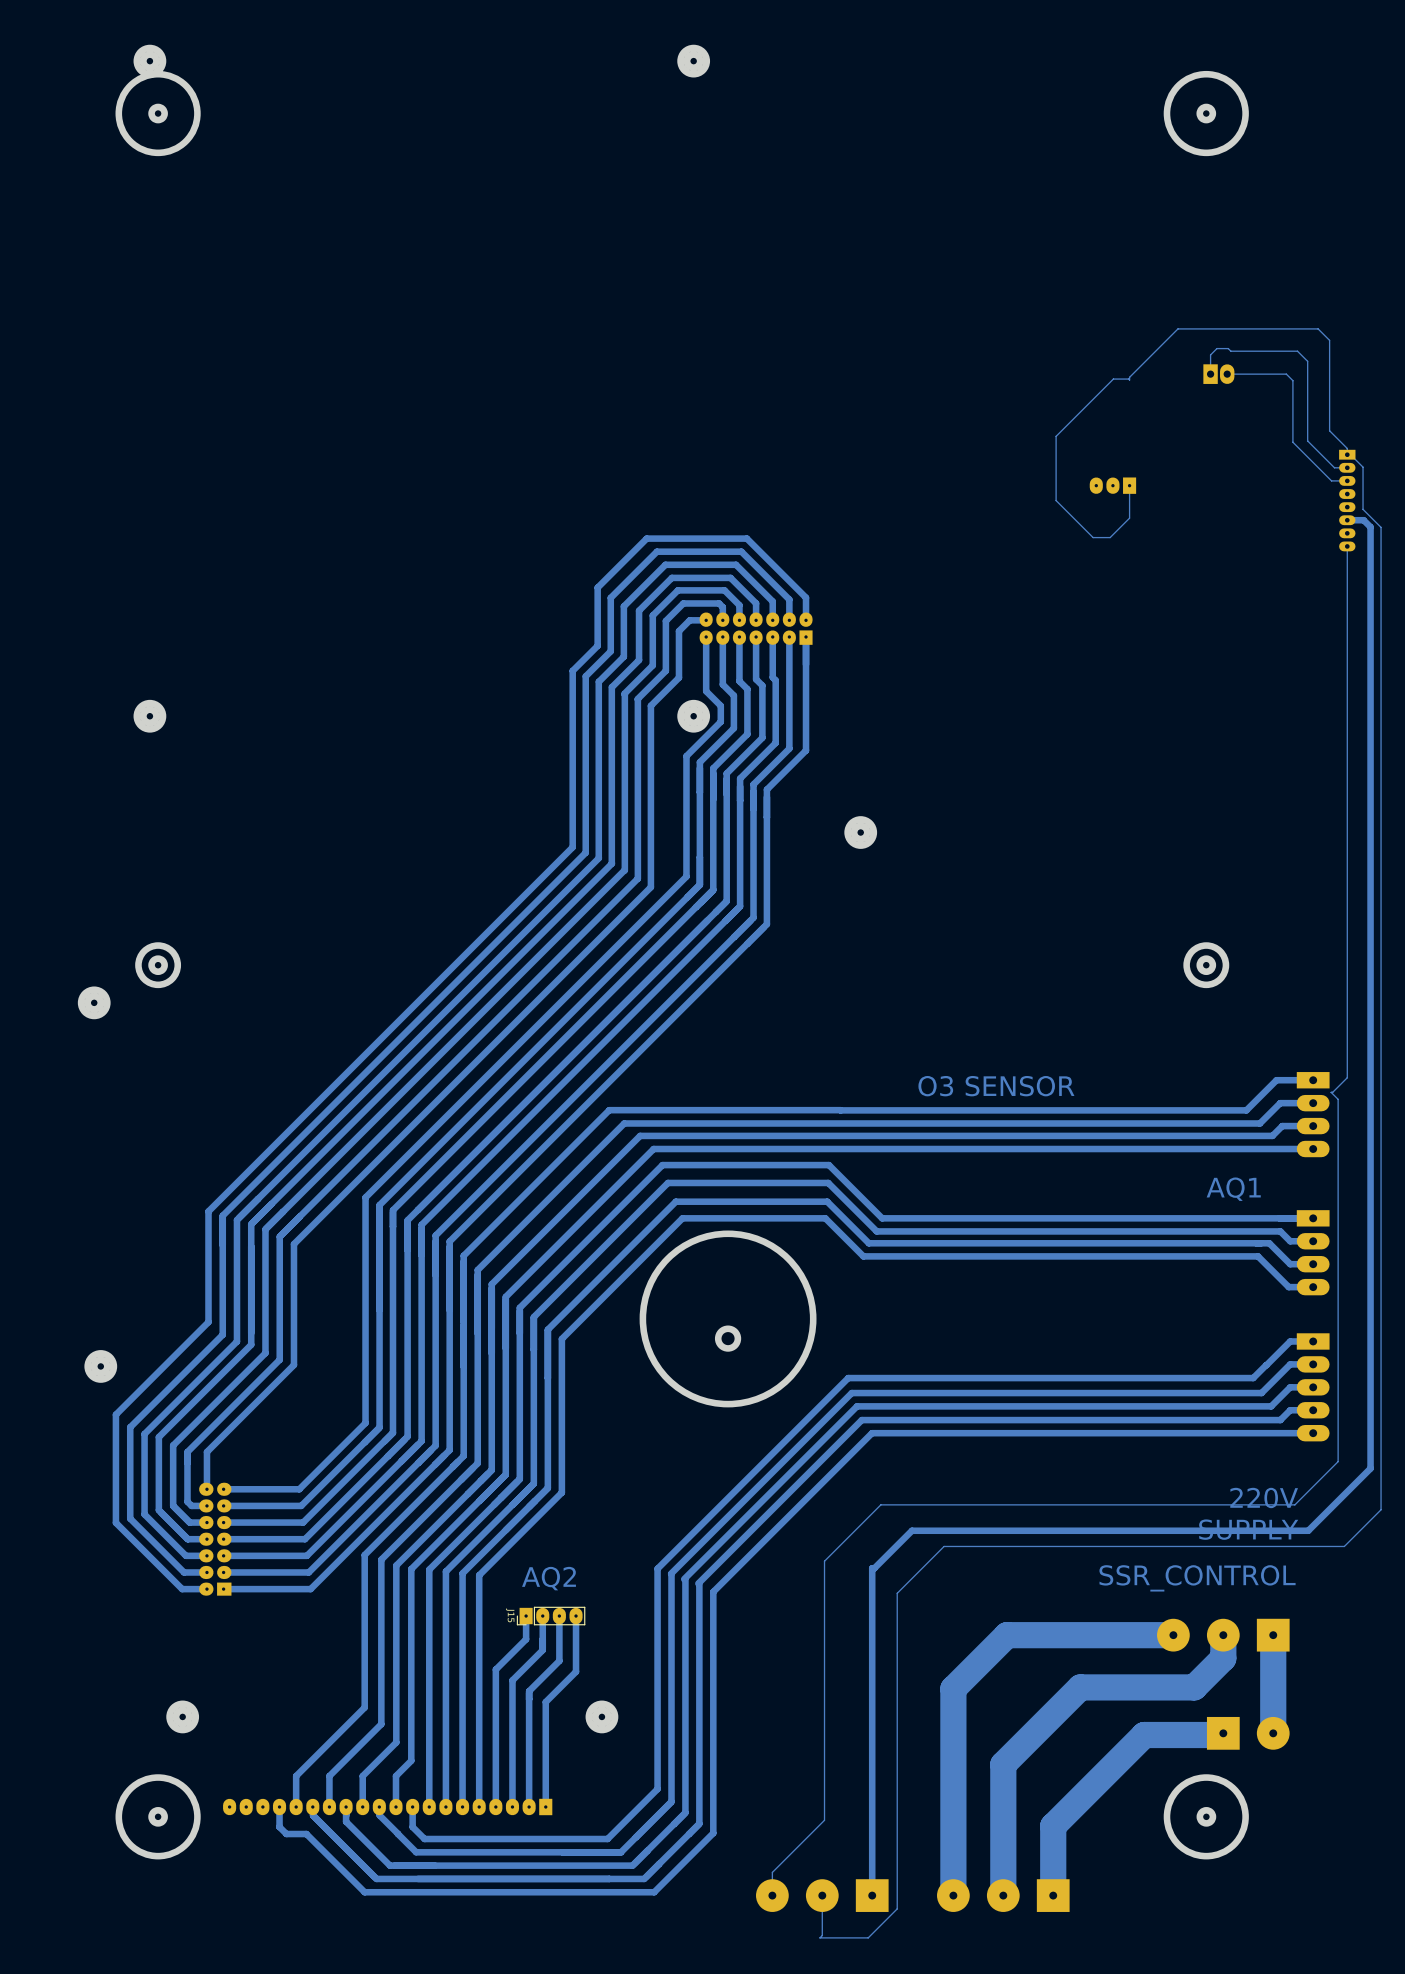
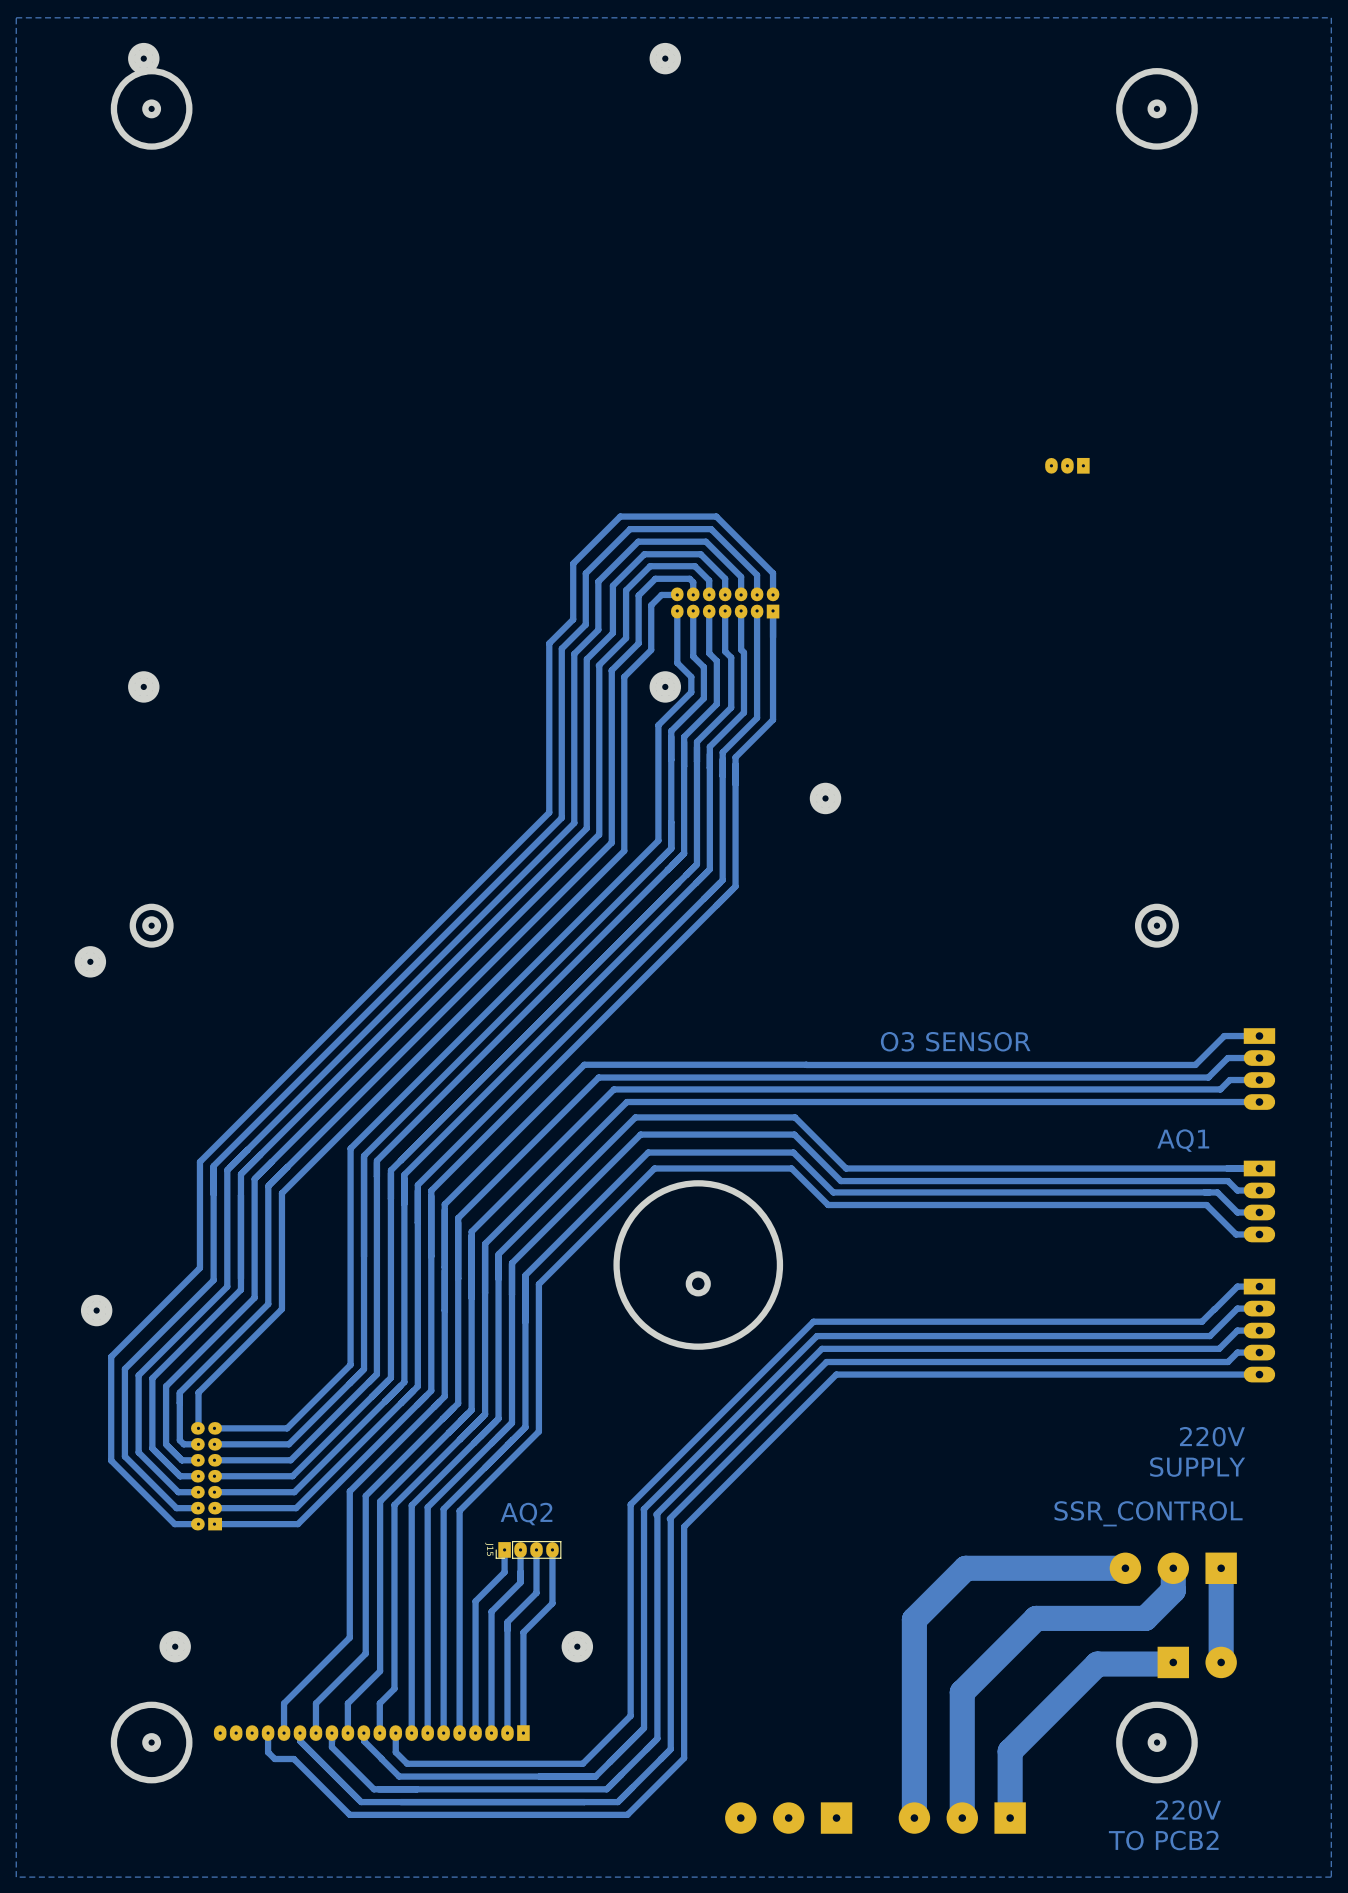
zone outline: none -> (1331, 17) (1331, 1877) (16, 1877) (16, 17) (1331, 17)
track: (1210, 374) (1210, 354) (1216, 348) (1228, 348) (1230, 351) (1297, 351) (1307, 361) (1307, 440) (1334, 467) (1347, 467) -> none
part: (1218, 374) -> none
track: (1227, 374) (1286, 374) (1292, 380) (1292, 442) (1331, 480) (1347, 480) -> none
track: (1129, 485) (1129, 518) (1110, 537) (1093, 537) (1056, 500) (1056, 436) (1113, 379) (1129, 380) (1129, 377) (1177, 328) (1318, 328) (1329, 340) (1329, 430) (1347, 448) (1347, 454) (1350, 454) (1363, 467) (1363, 509) (1381, 527) (1381, 1509) (1344, 1546) (944, 1546) (897, 1593) (897, 1908) (868, 1937) (819, 1937) (822, 1935) (822, 1895) -> none
part: (1347, 500) -> none
track: (1347, 520) (1363, 520) (1370, 527) (1370, 1468) (1308, 1530) (911, 1530) (874, 1568) (872, 1568) (872, 1895) -> none
track: (1347, 546) (1347, 1077) (1331, 1092) -> none
track: (1331, 1092) (1338, 1099) (1338, 1461) (1294, 1504) (880, 1504) (824, 1561) (824, 1820) (772, 1872) (772, 1895) -> none
text: none -> 220V (1188, 1810)
text: none -> TO PCB2 (1163, 1840)

